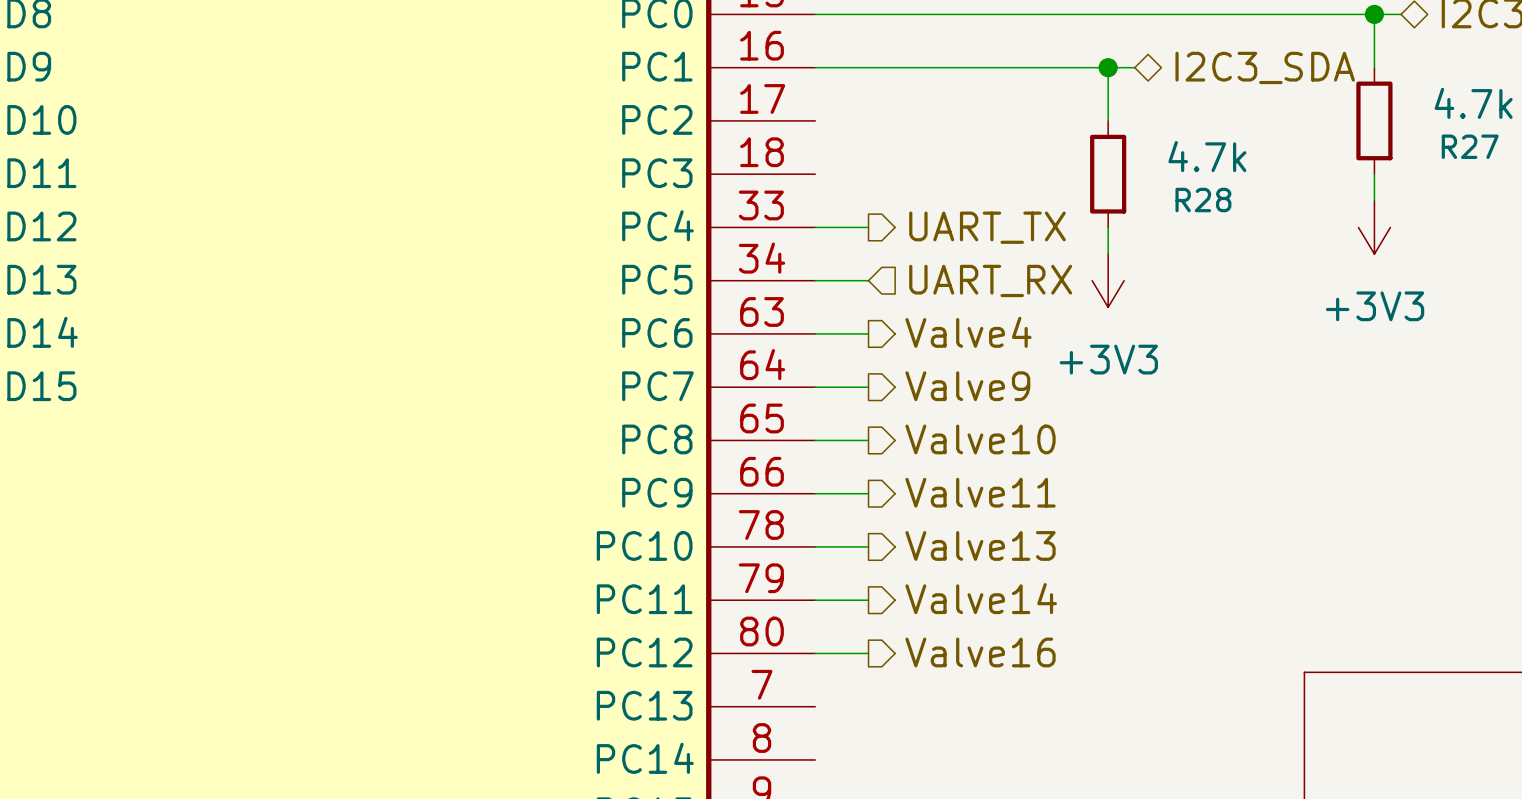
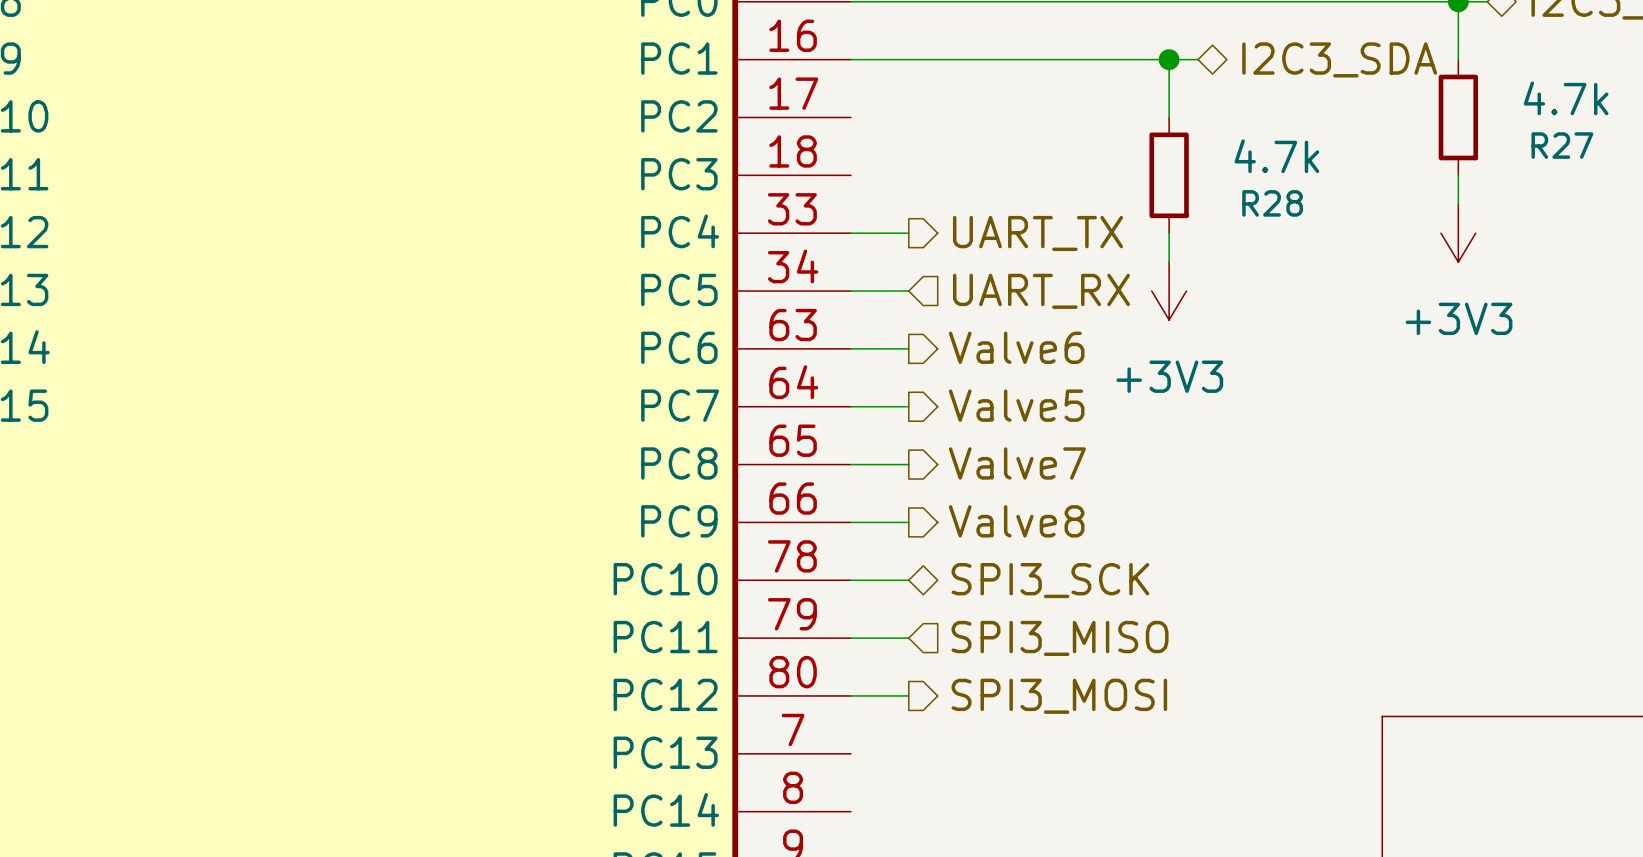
hierarchical label: Valve4 (968, 332) -> Valve6 (1016, 347)
hierarchical label: Valve9 (967, 386) -> Valve5 (1016, 405)
hierarchical label: Valve10 (980, 439) -> Valve7 (1017, 463)
hierarchical label: Valve11 (980, 492) -> Valve8 (1016, 521)
hierarchical label shape: output (980, 545) -> bidirectional (1050, 580)
hierarchical label: Valve13 (980, 545) -> SPI3_SCK (1050, 580)
hierarchical label shape: output (981, 598) -> input (1060, 638)
hierarchical label: Valve14 (981, 598) -> SPI3_MISO (1060, 638)
hierarchical label: Valve16 (980, 652) -> SPI3_MOSI (1059, 696)

